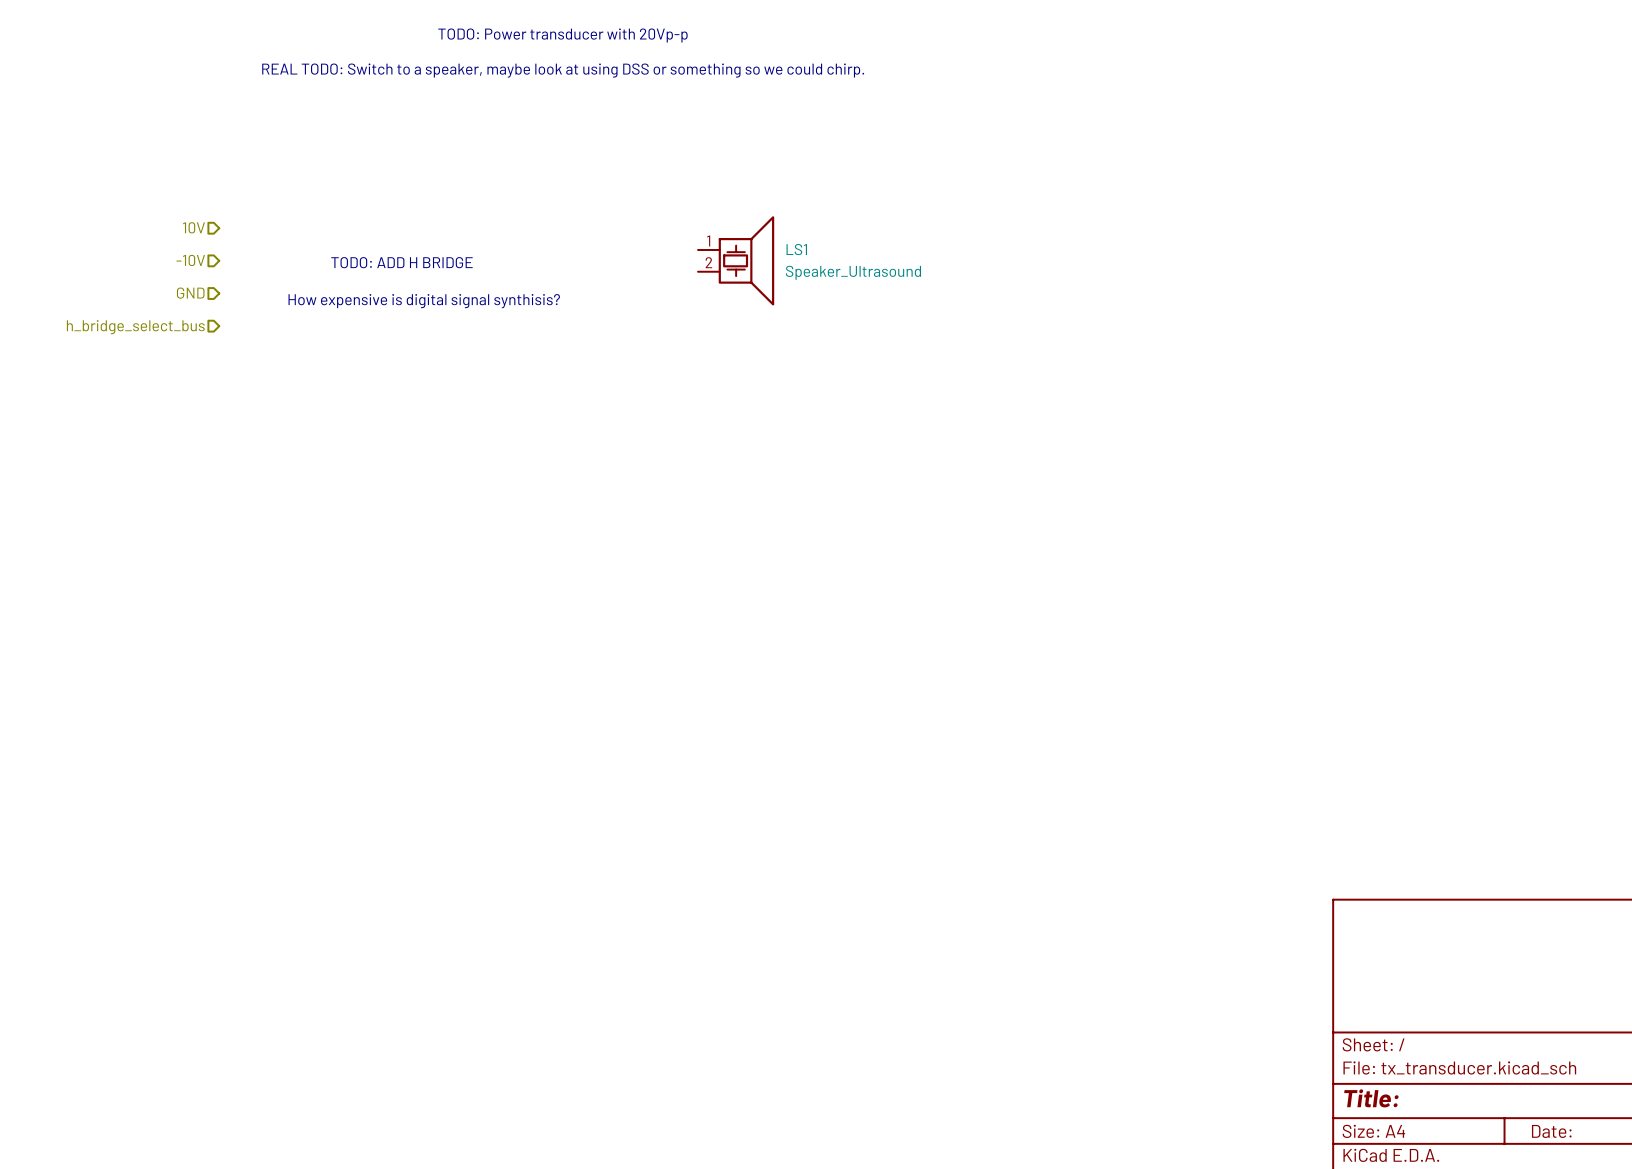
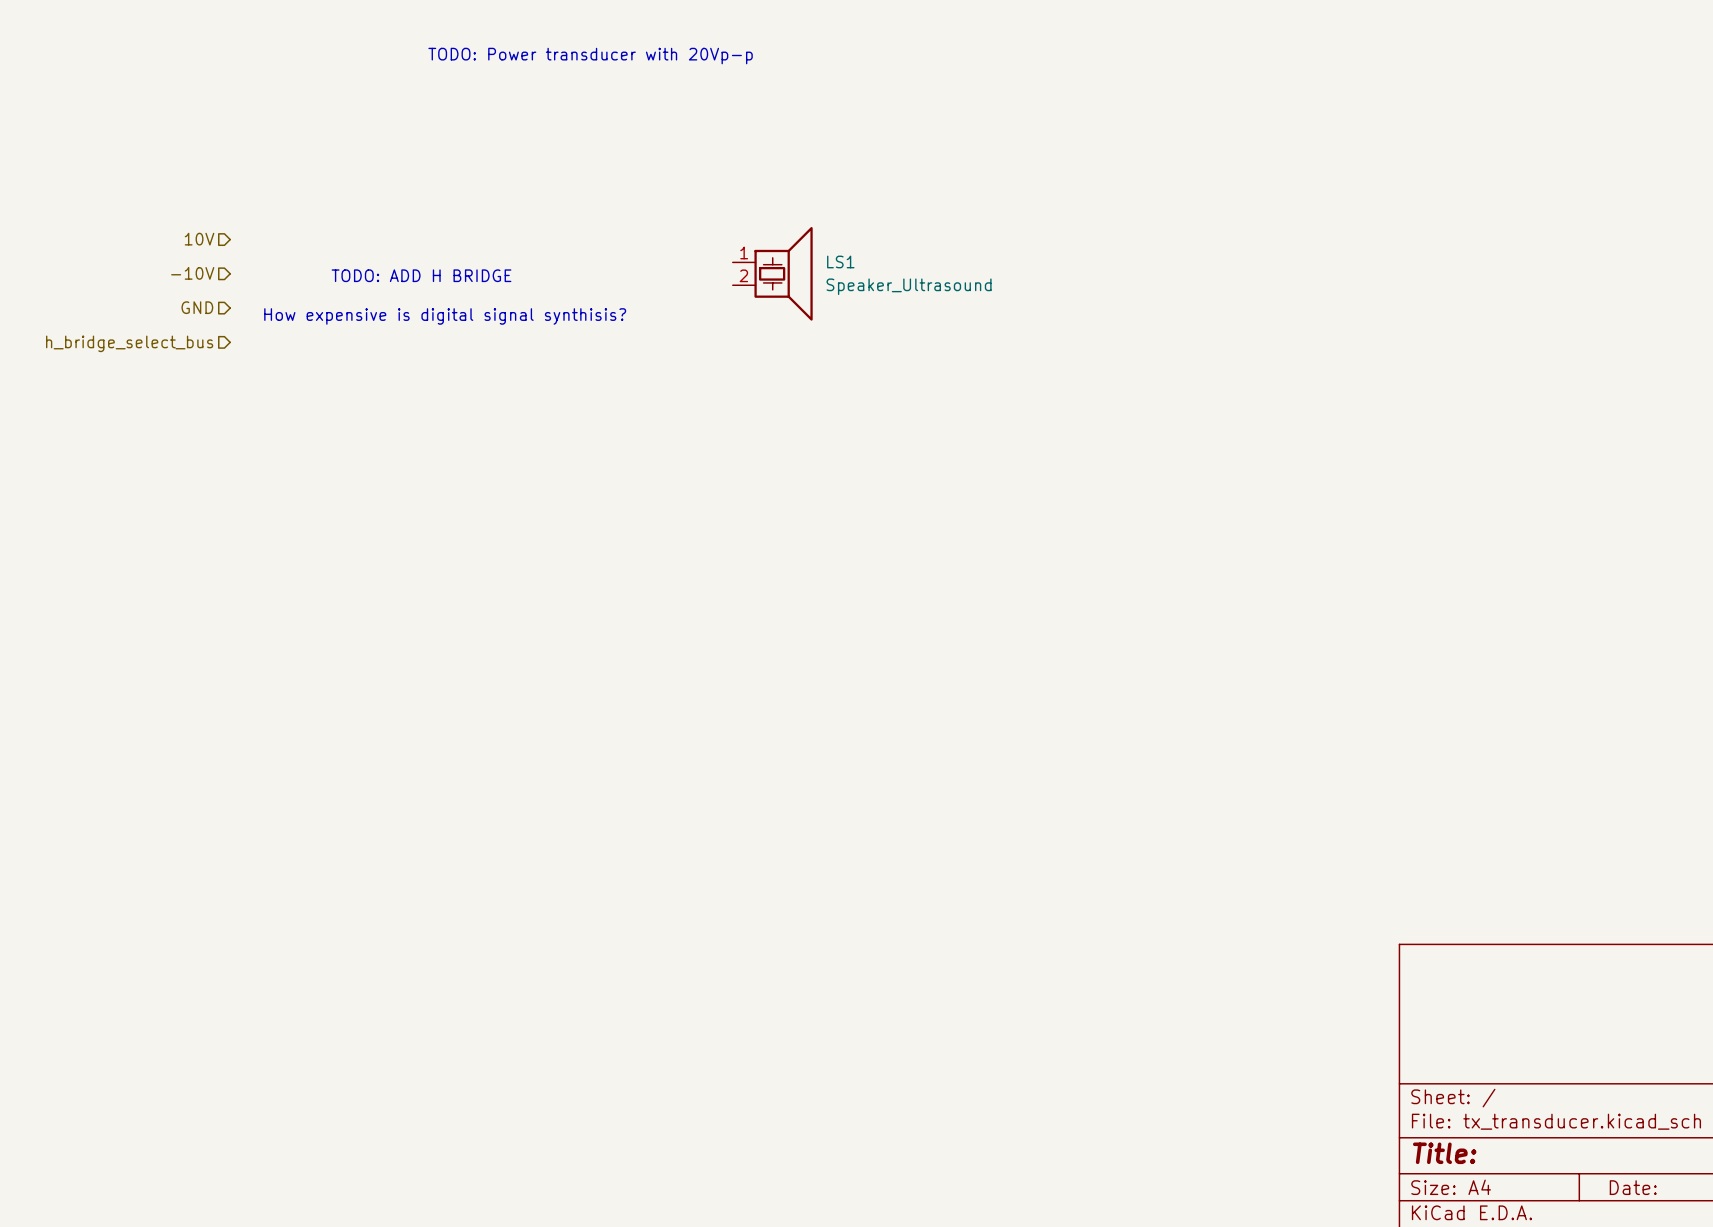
text position: TODO: Power transducer with 20Vp-p (562, 35) -> TODO: Power transducer with 20Vp-p (590, 56)
text: REAL TODO: Switch to a speaker, maybe look at using DSS or something so we could chirp. (563, 70) -> none

